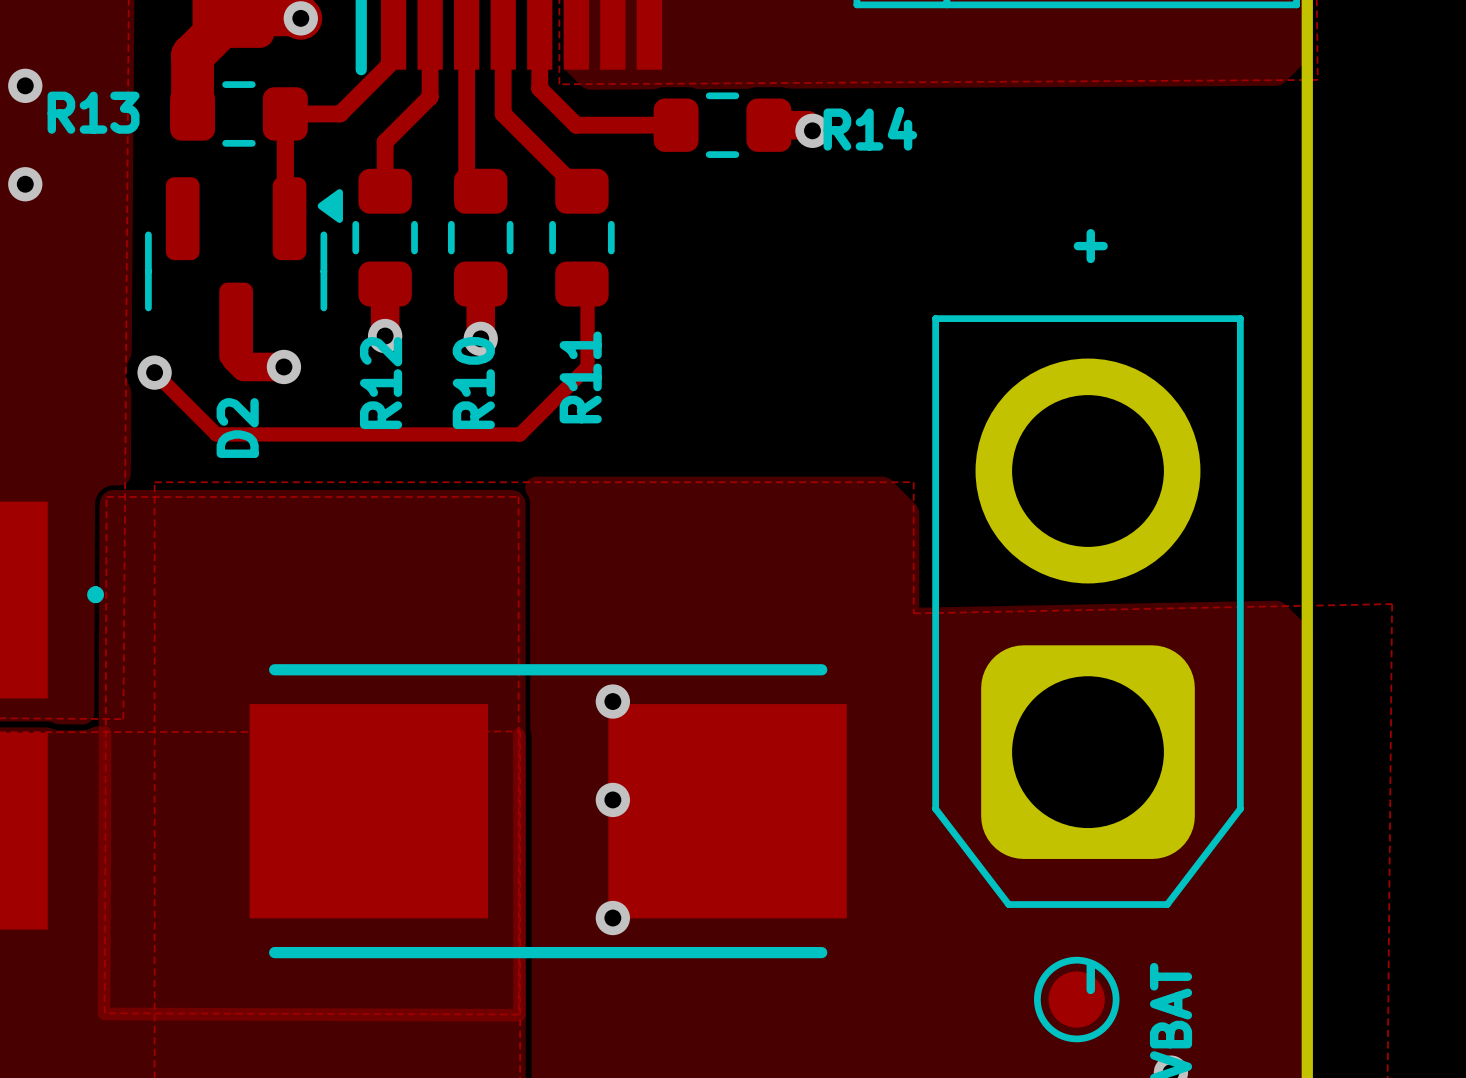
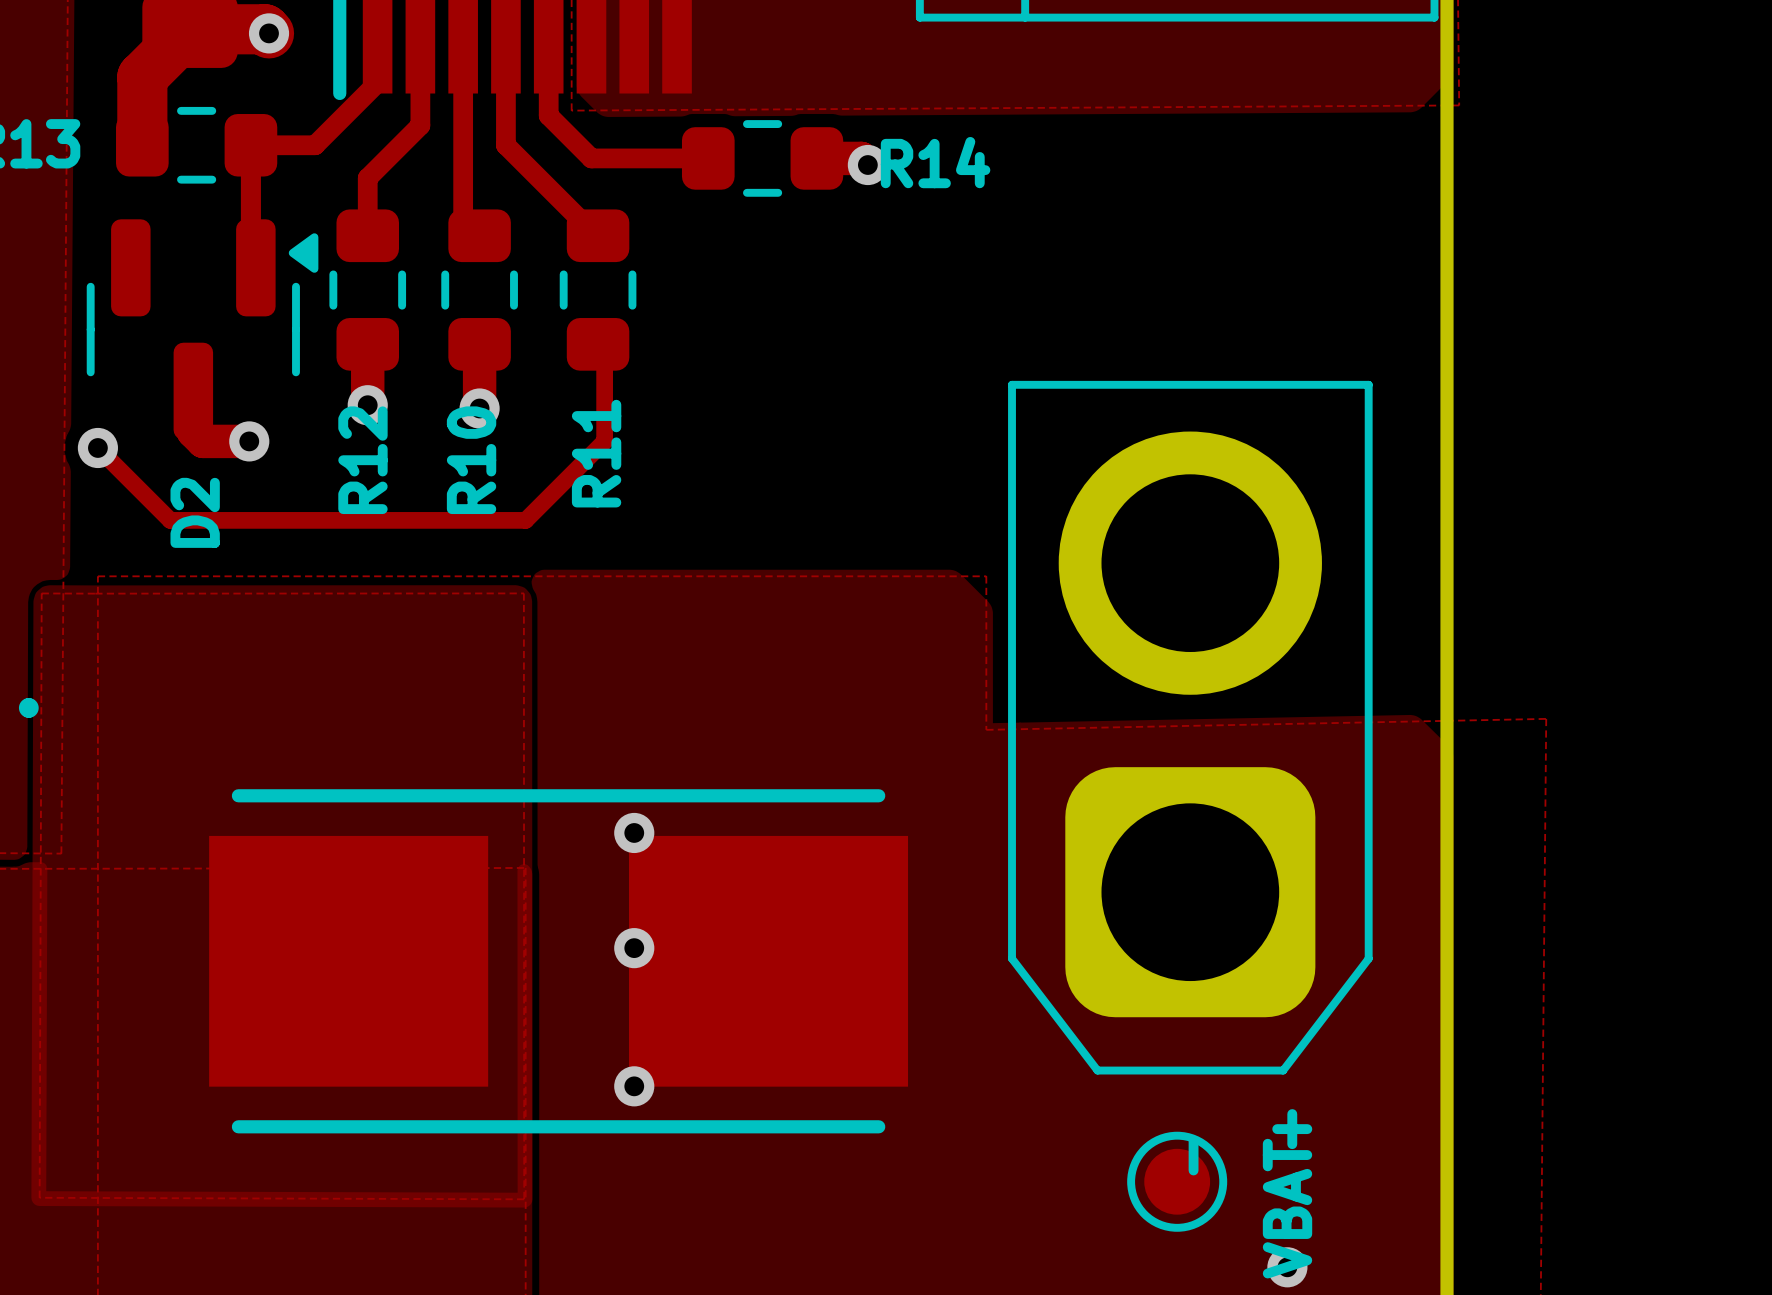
part text position: + (1090, 246) -> + (1292, 1129)

